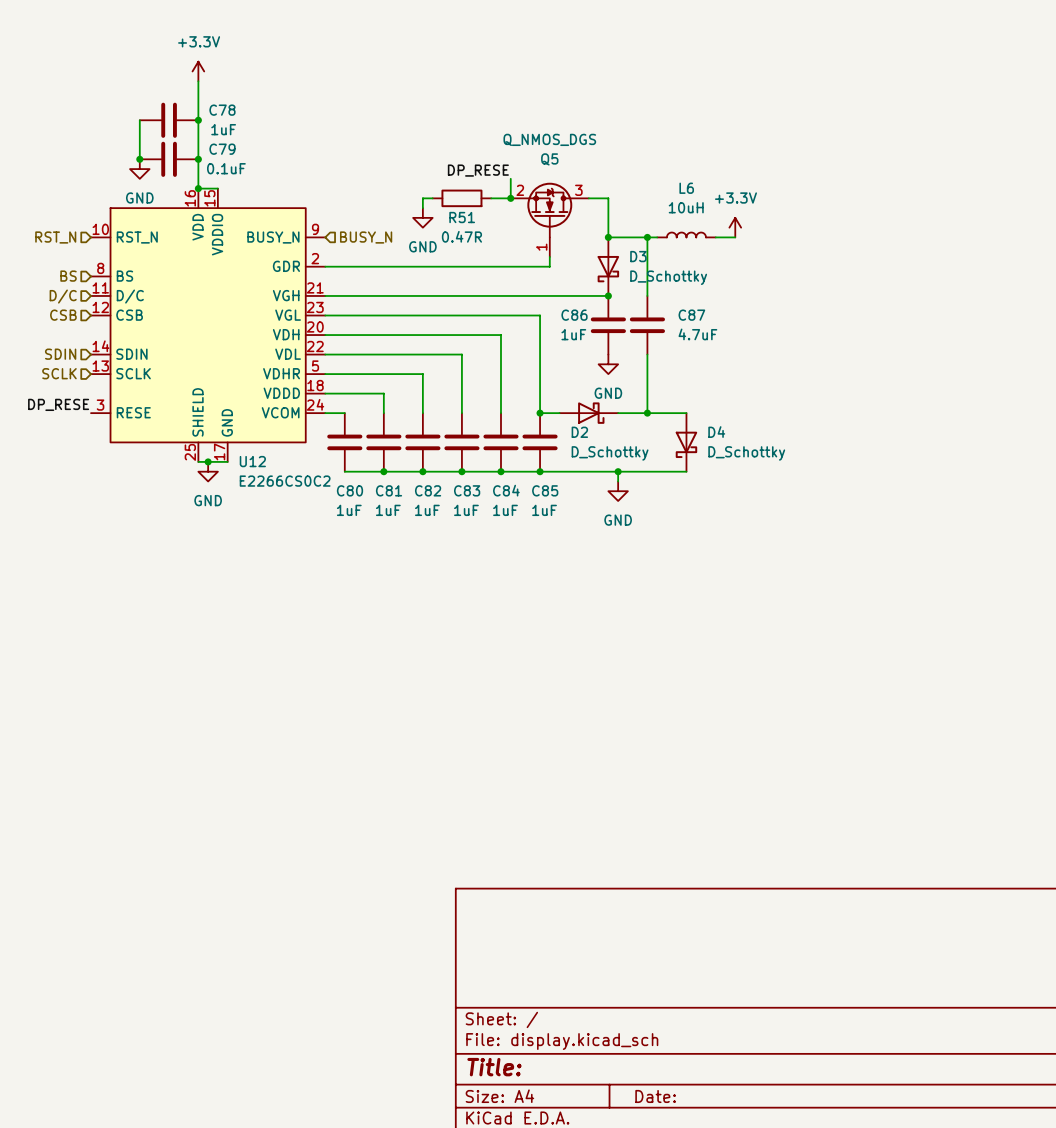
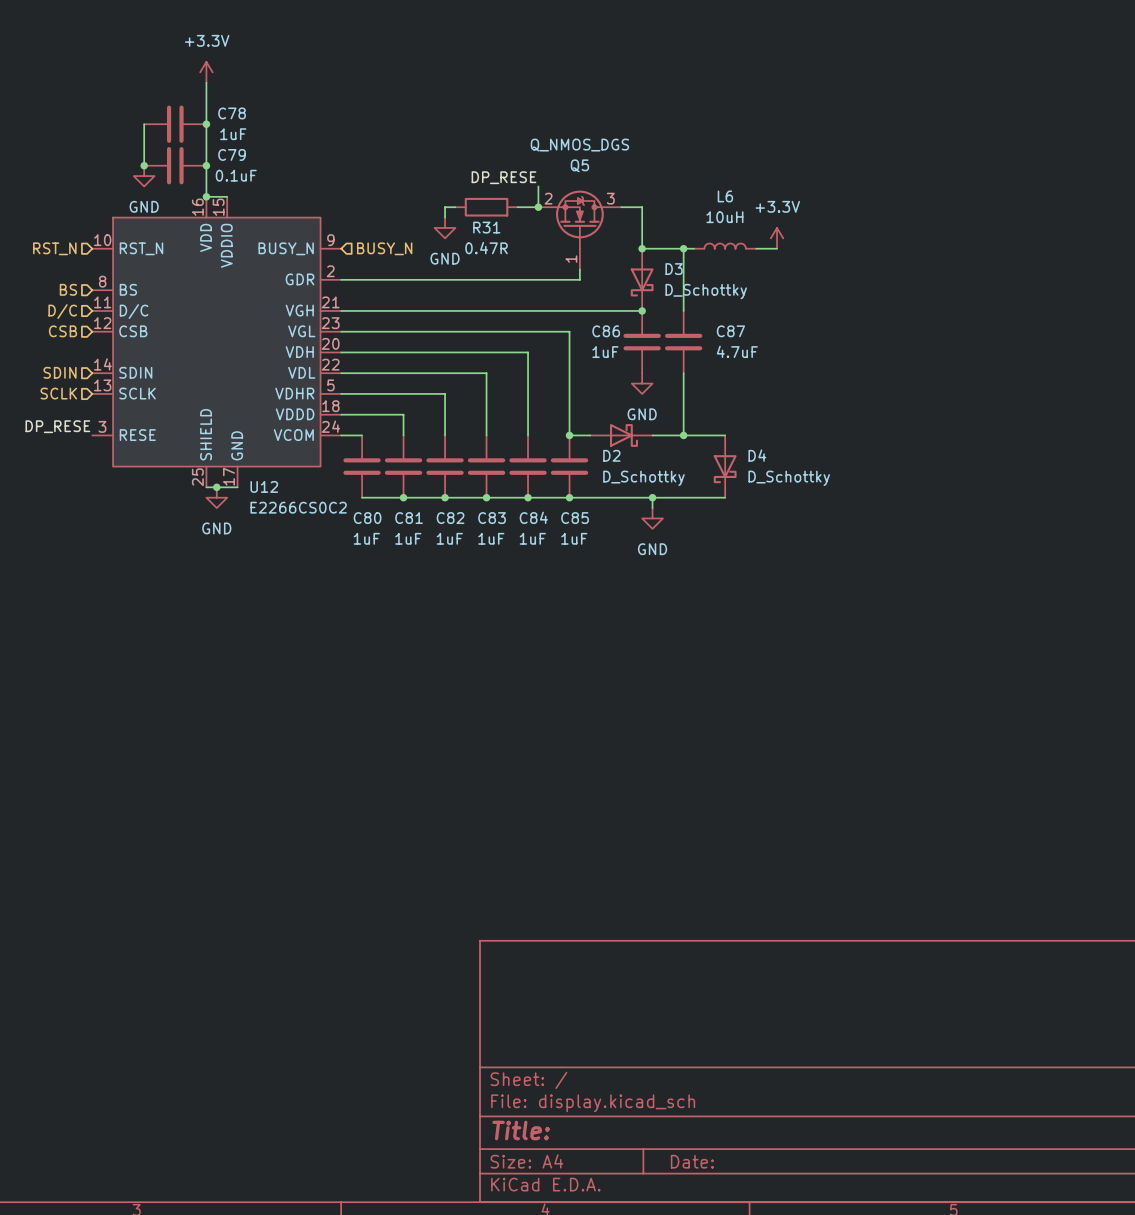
R51 name: R51 (462, 217) -> R31 (486, 227)

